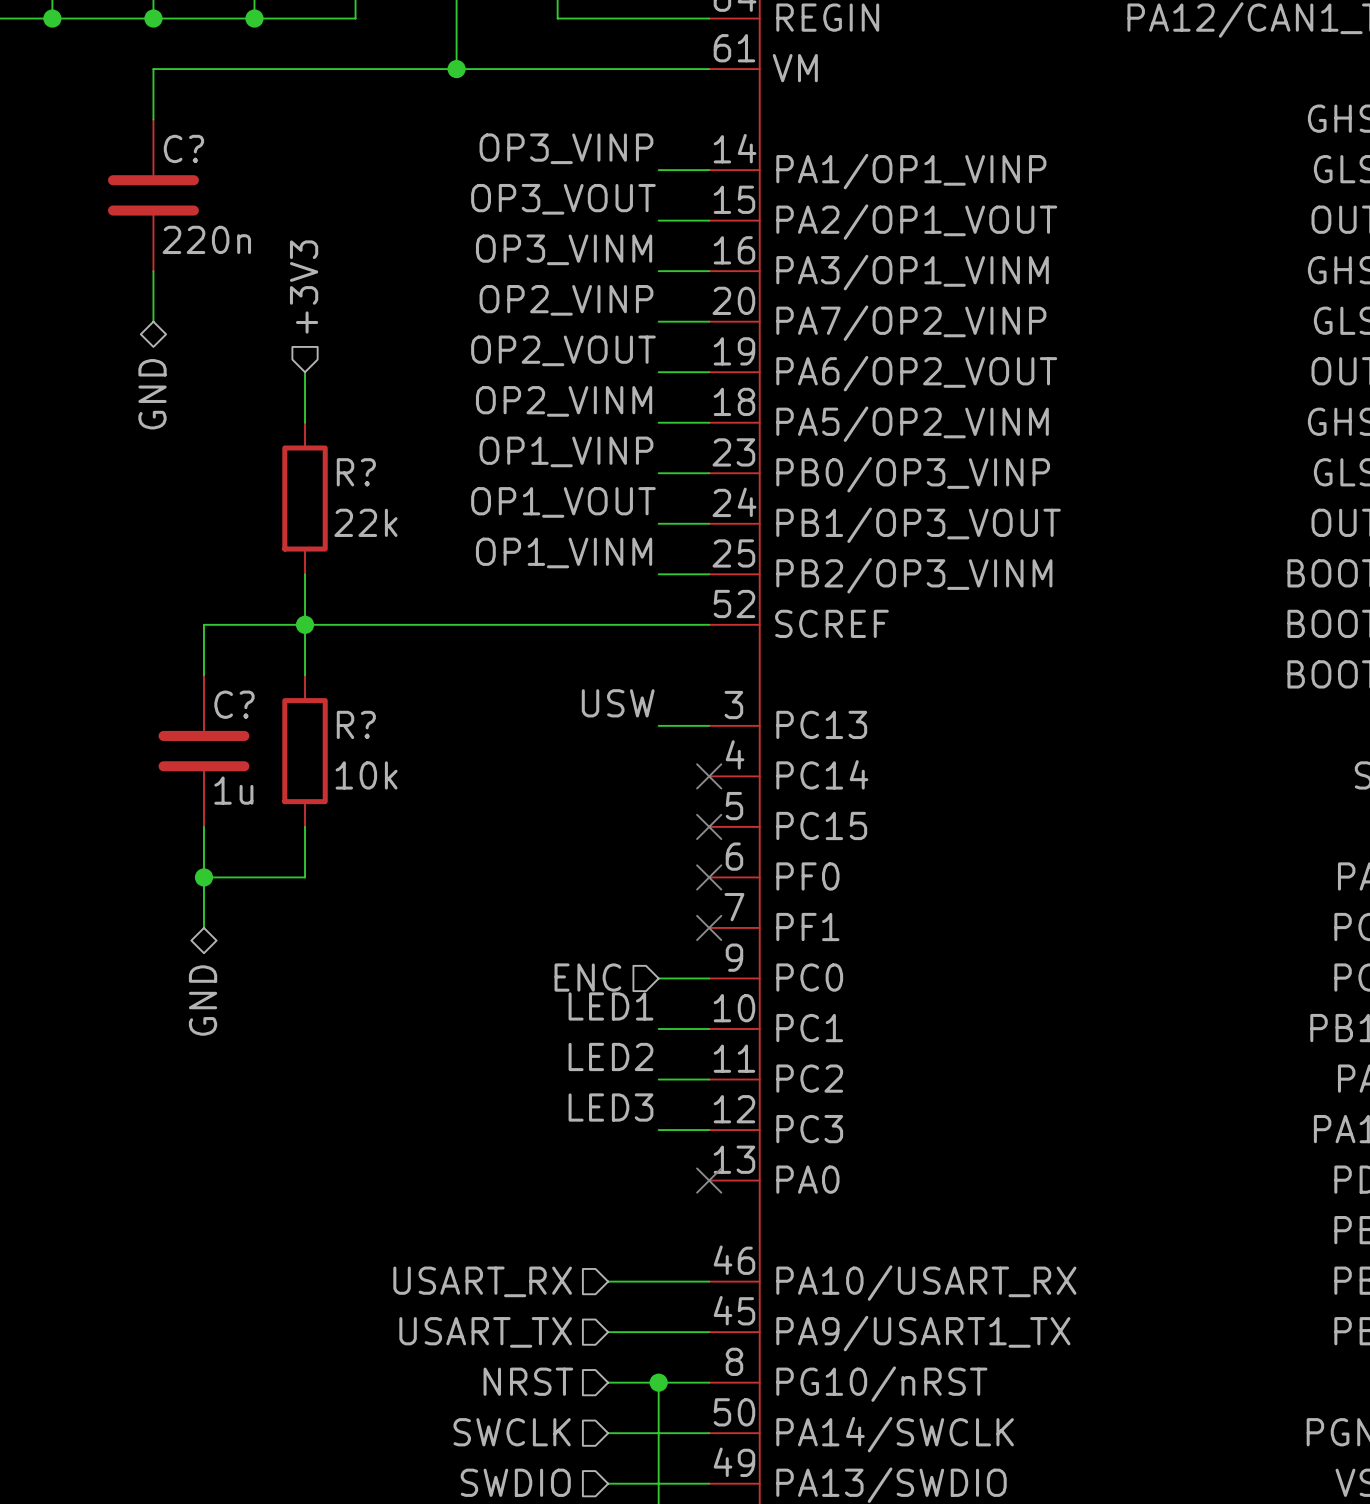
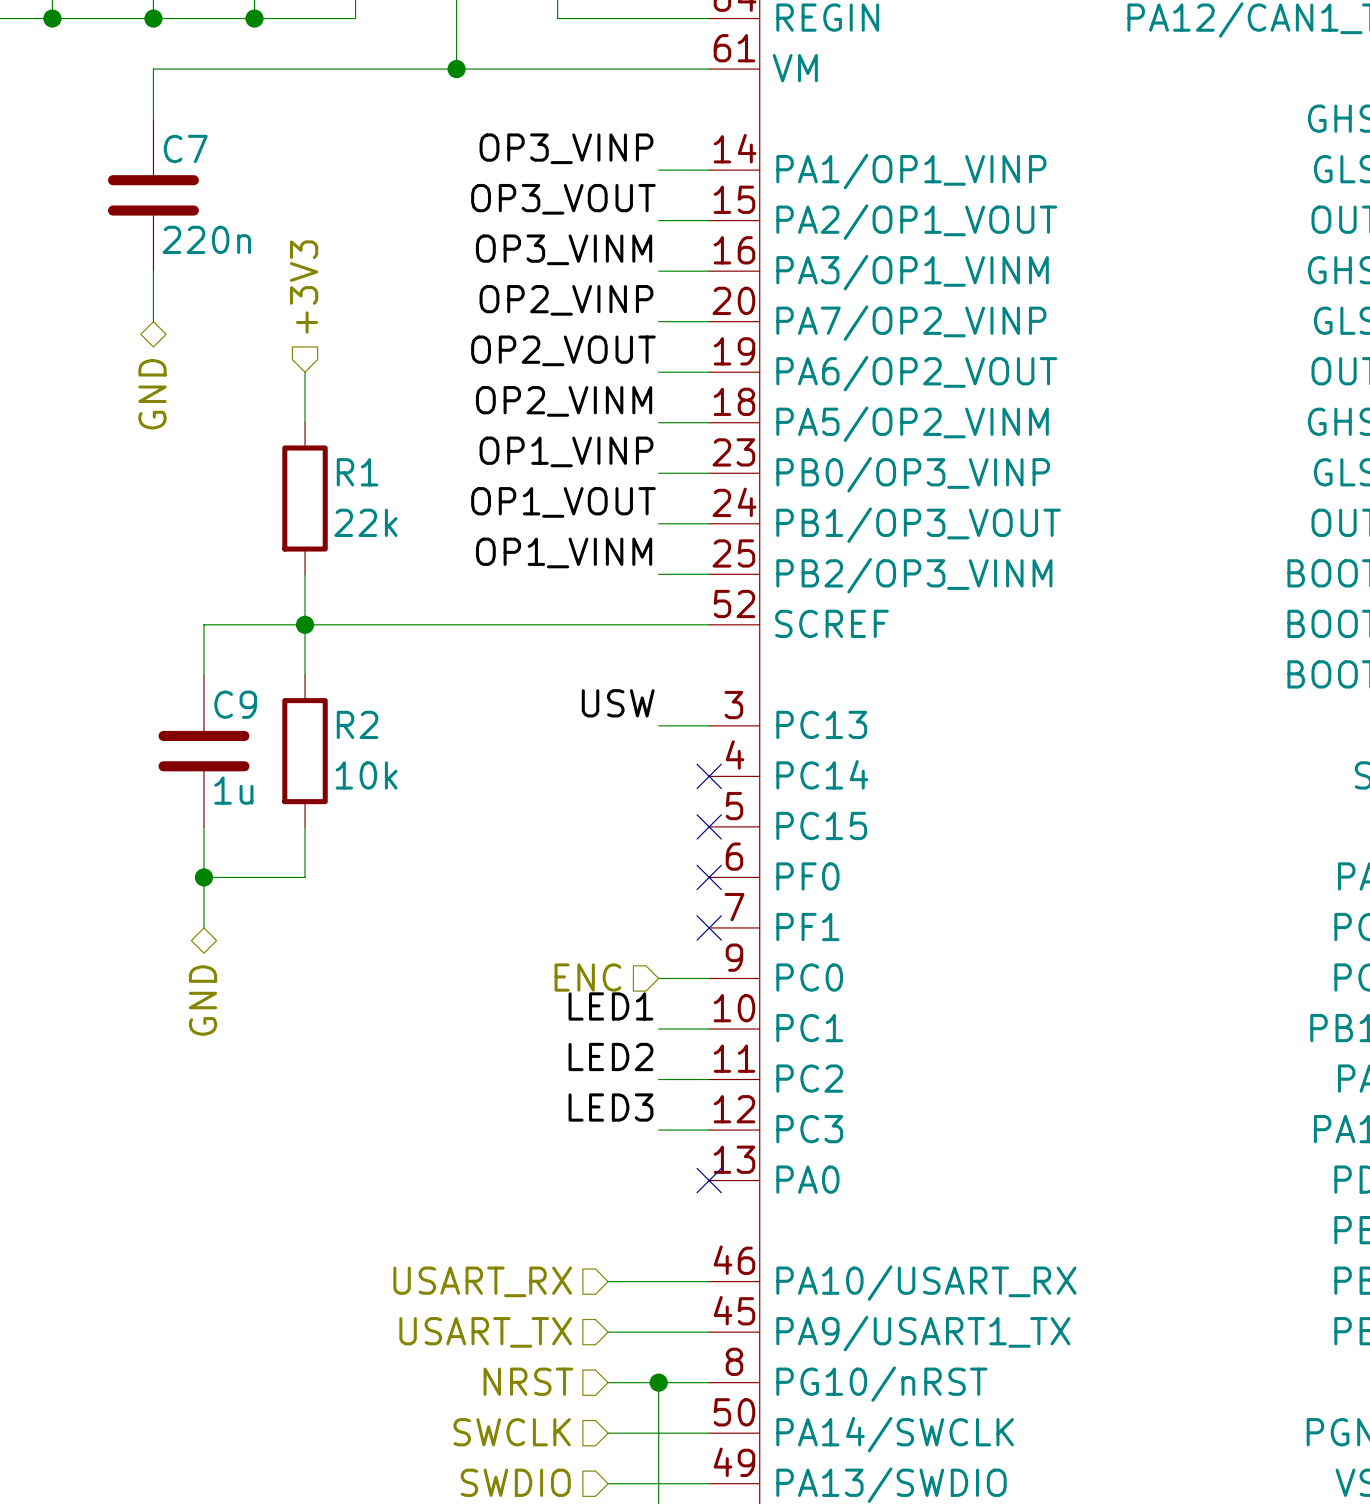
C? name: C? (183, 148) -> C7 (185, 148)
R? name: R? (356, 472) -> R1 (357, 472)
C? name: C? (234, 704) -> C9 (235, 704)
R? name: R? (356, 724) -> R2 (357, 724)

